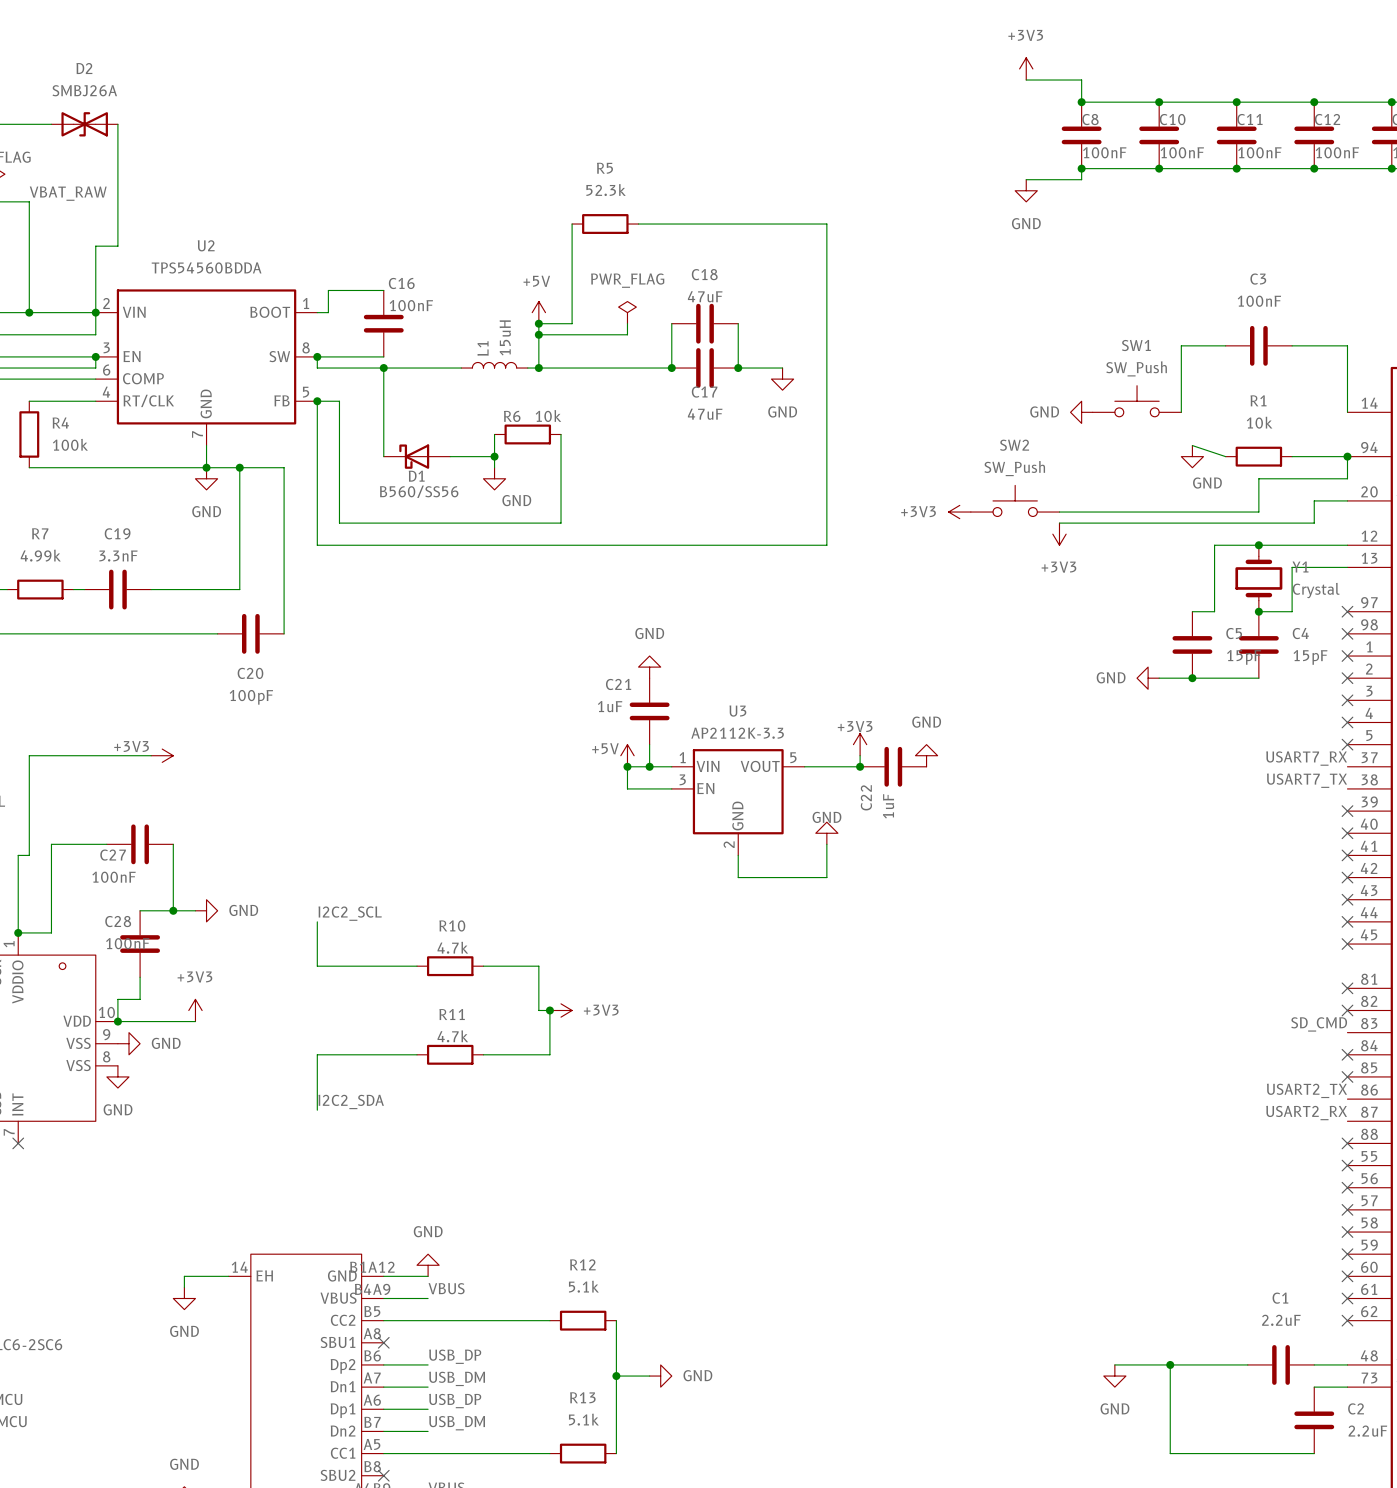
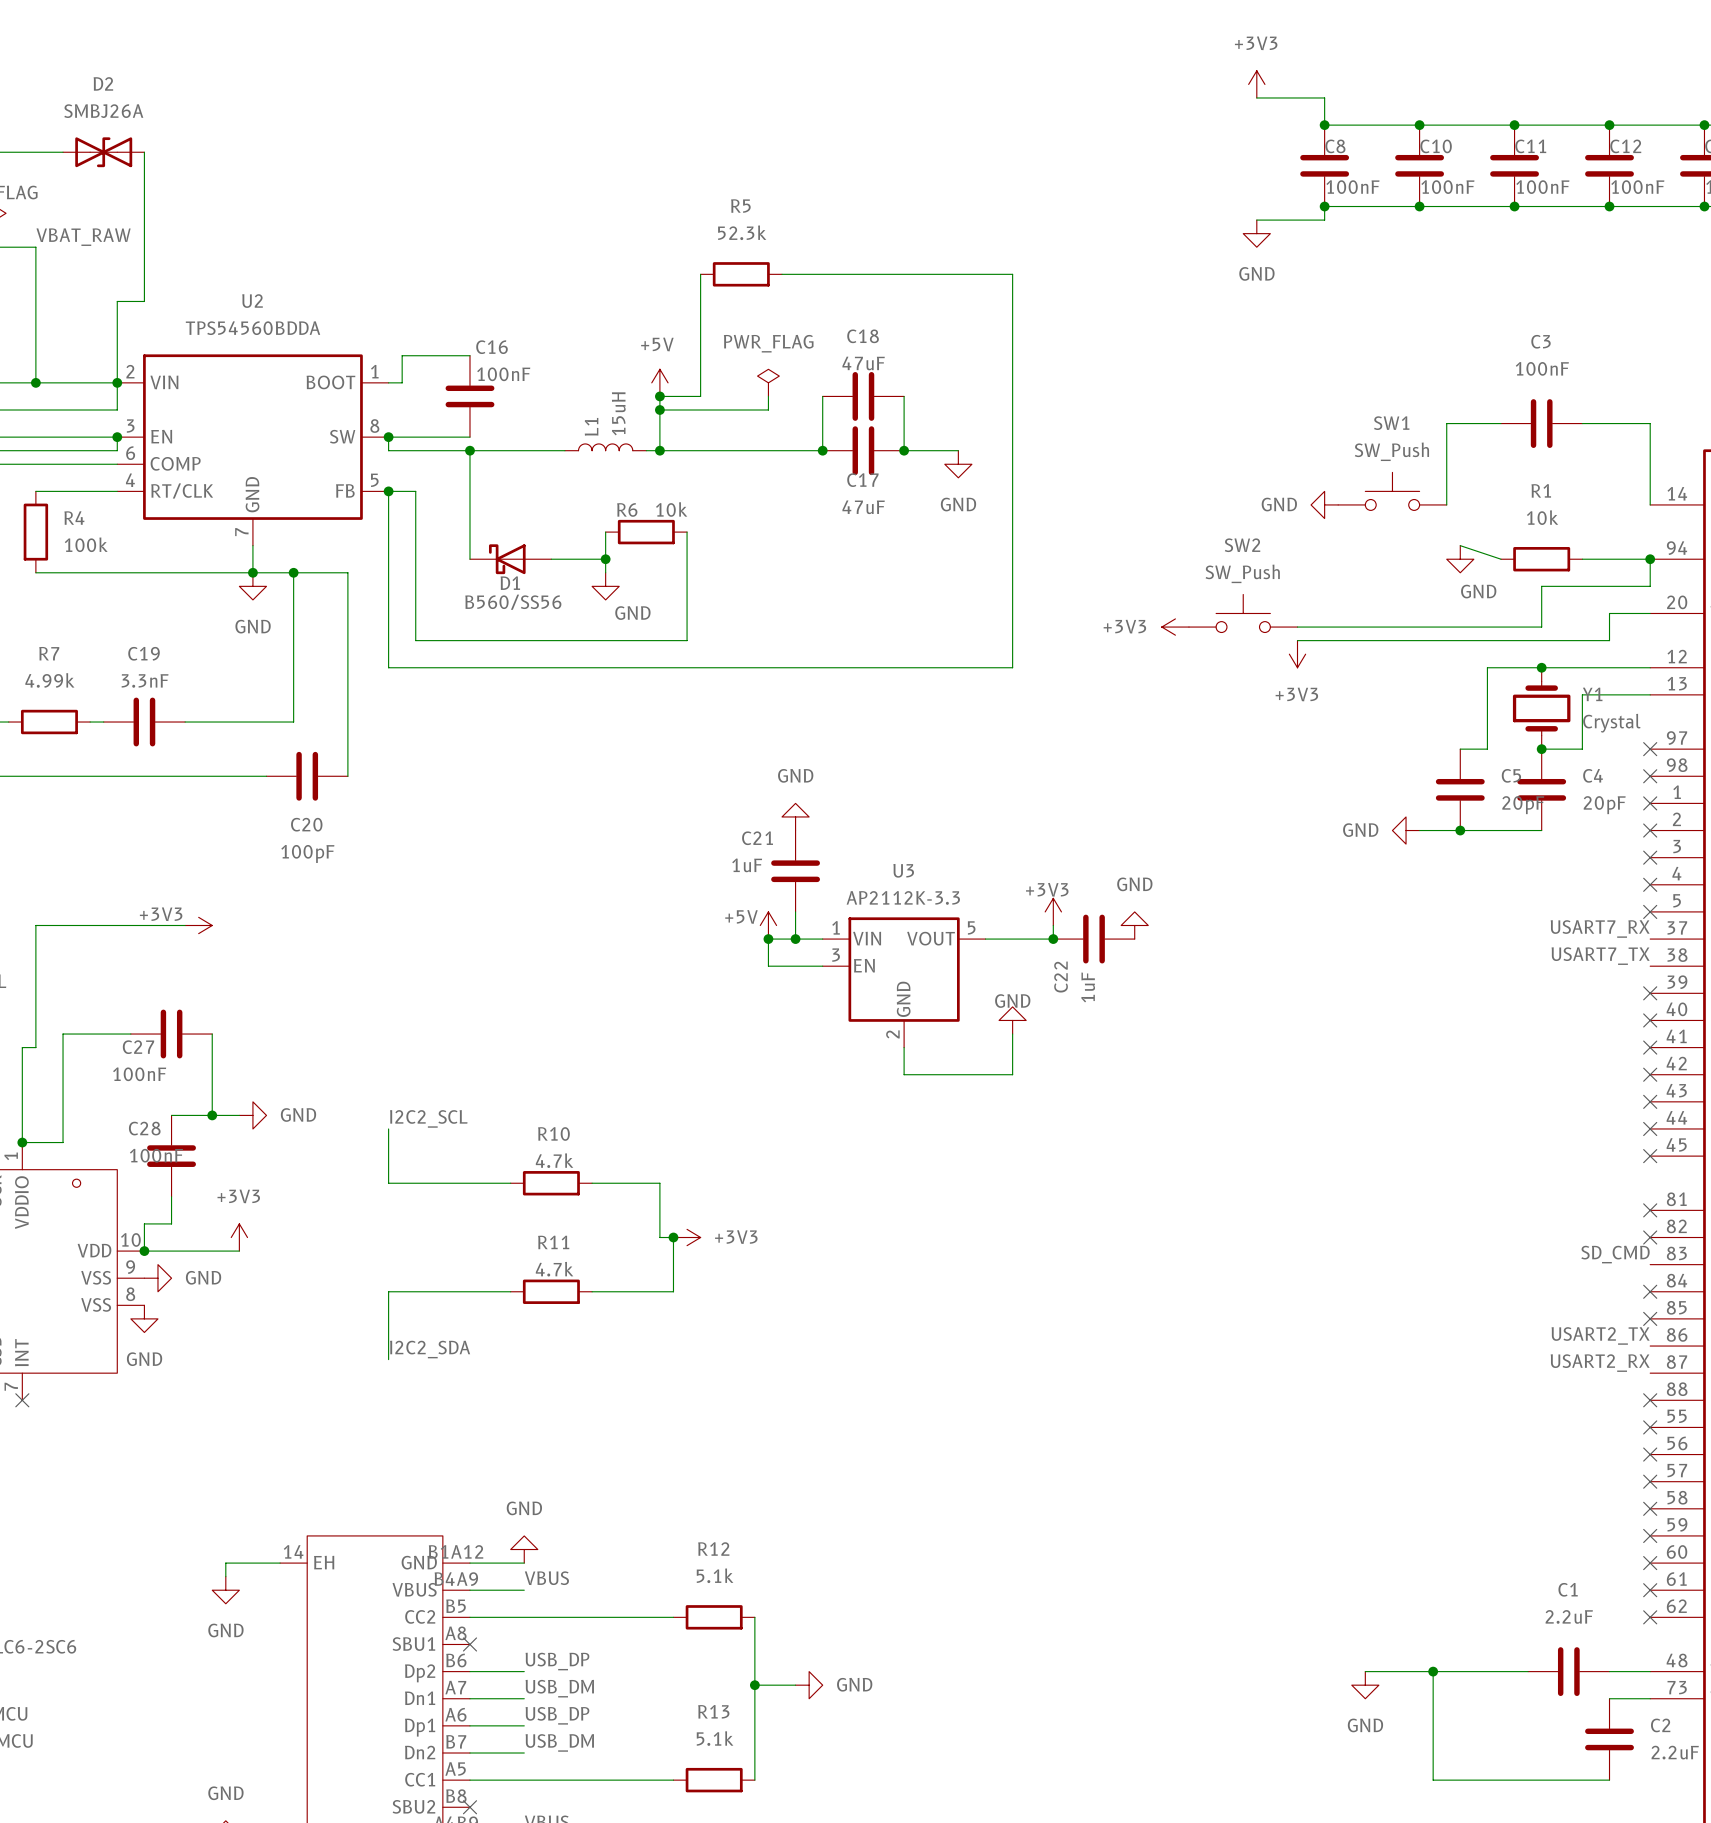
C5 value: 15pF (1244, 657) -> 20pF (1523, 805)
C4 value: 15pF (1310, 657) -> 20pF (1604, 805)

